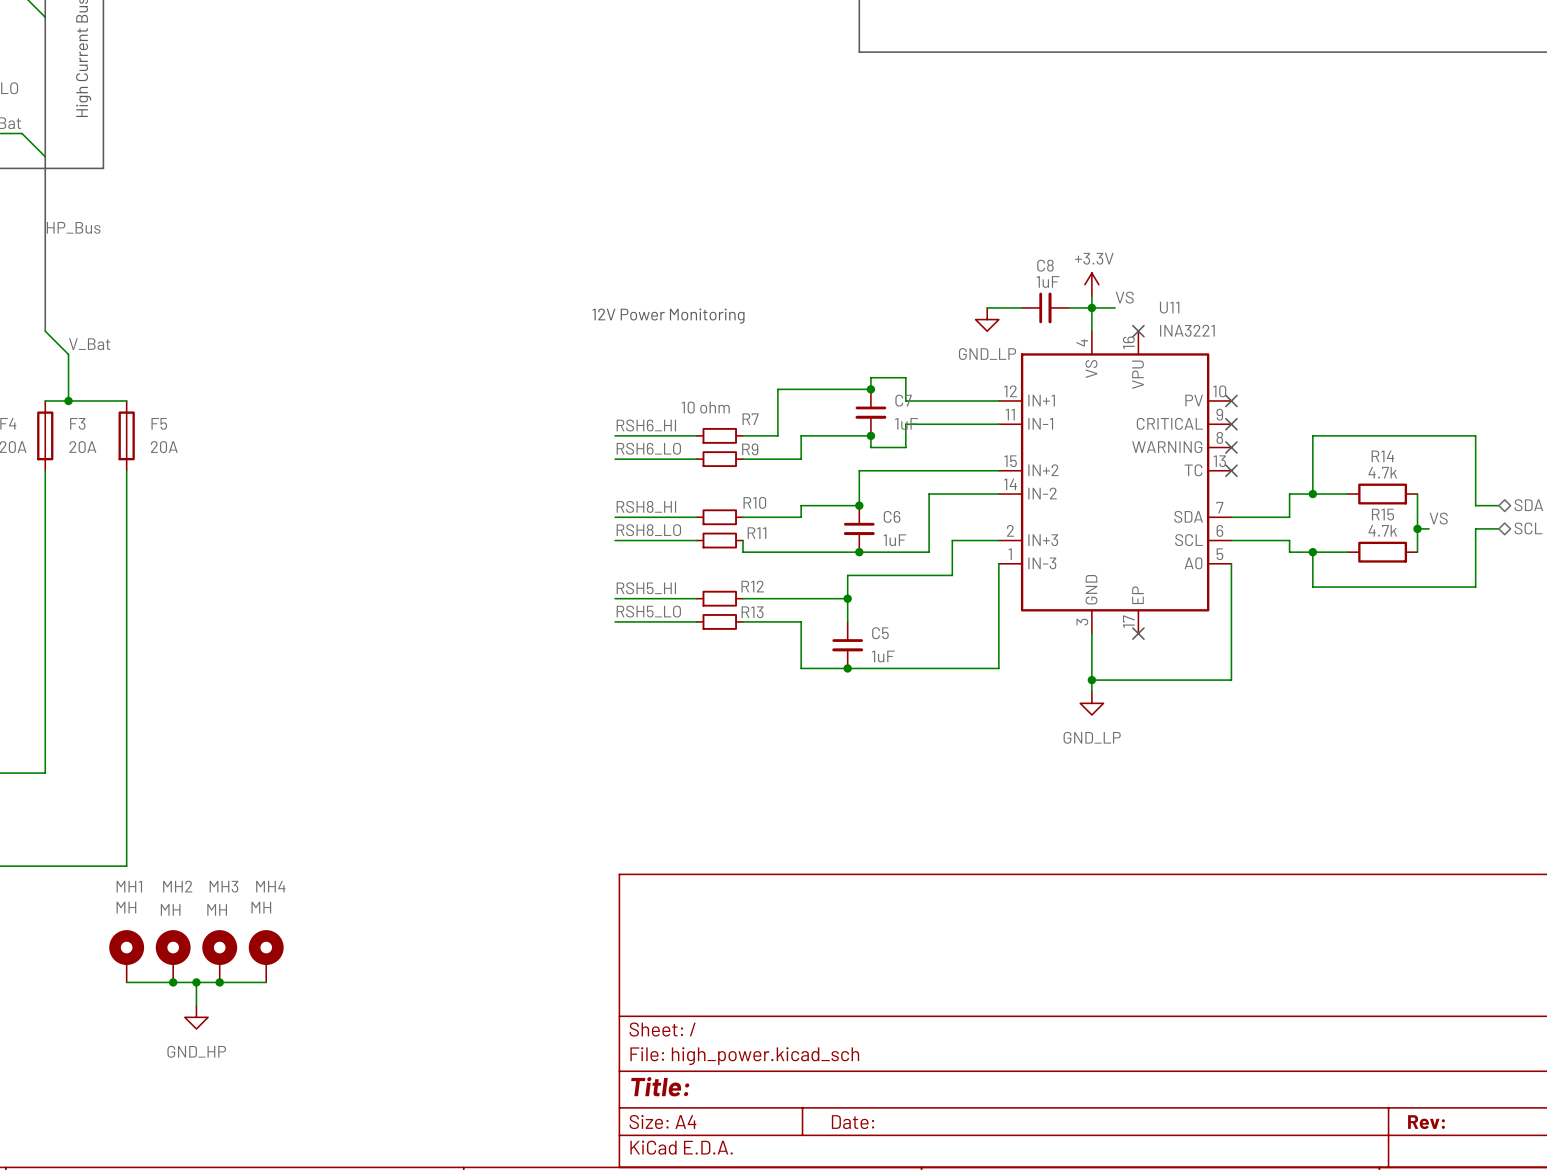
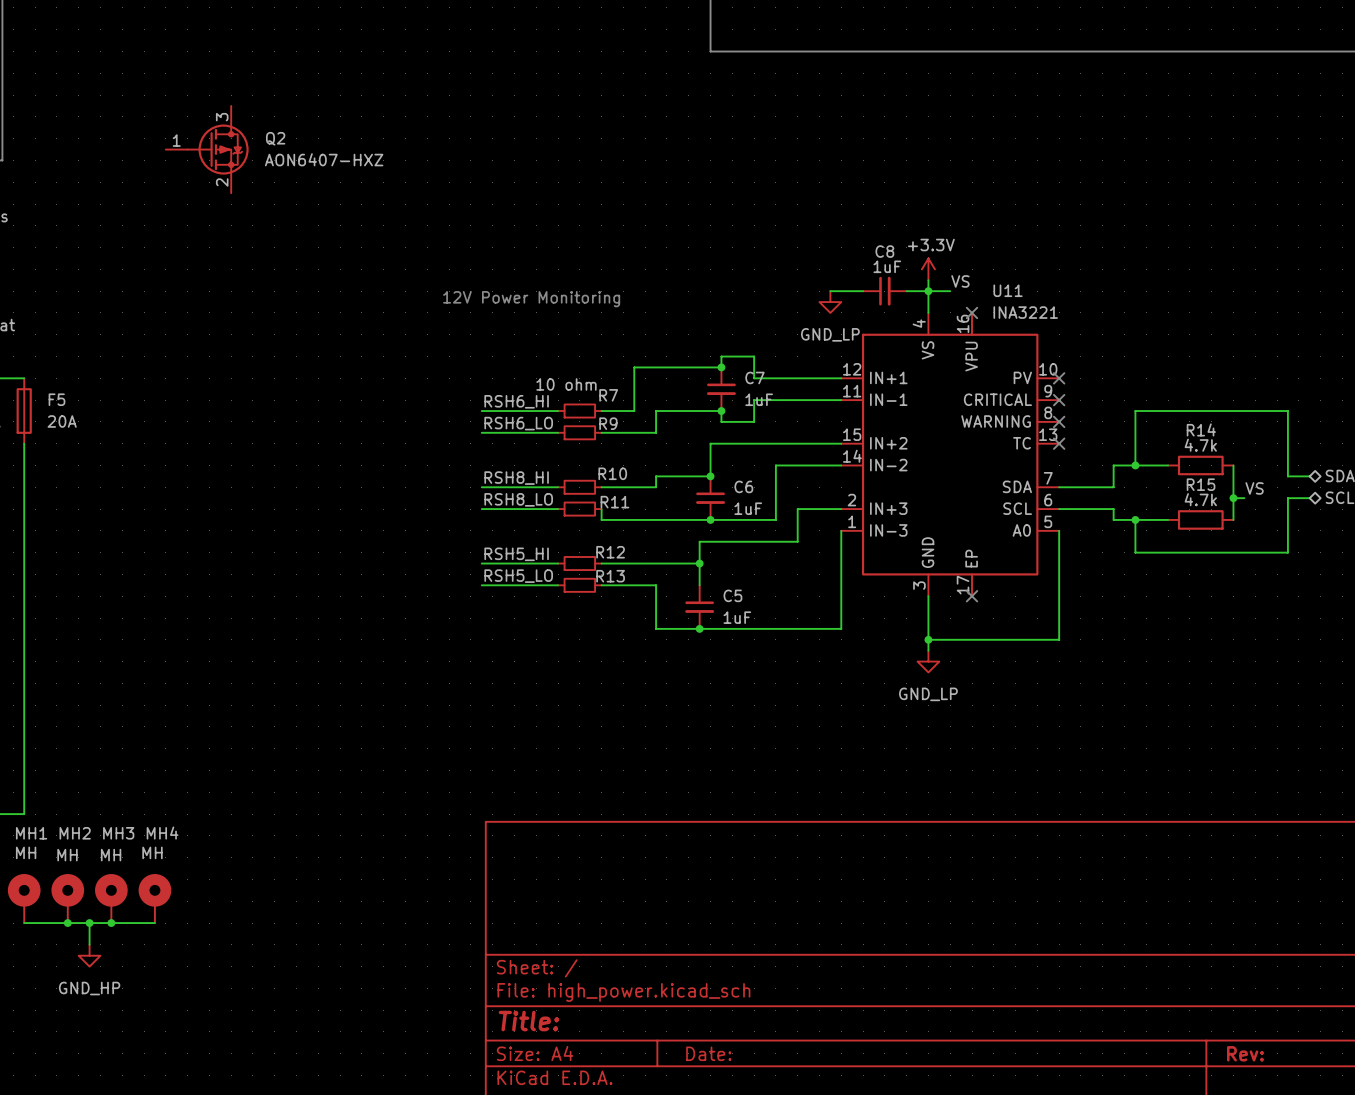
Q2: none -> AON6407-HXZ (207, 149)

